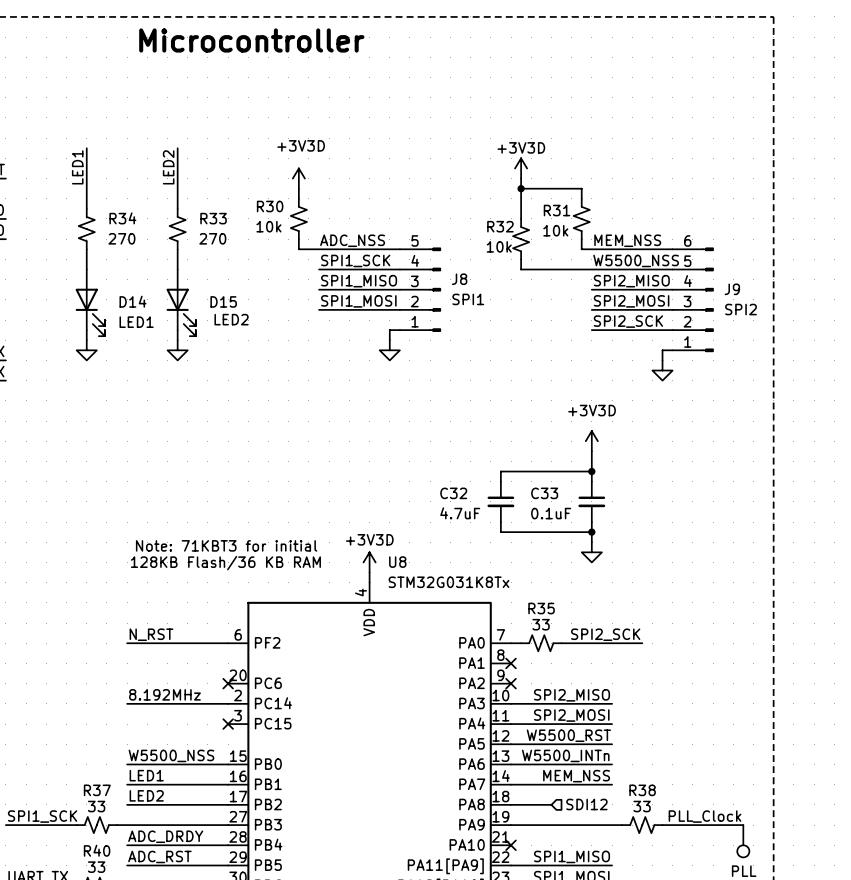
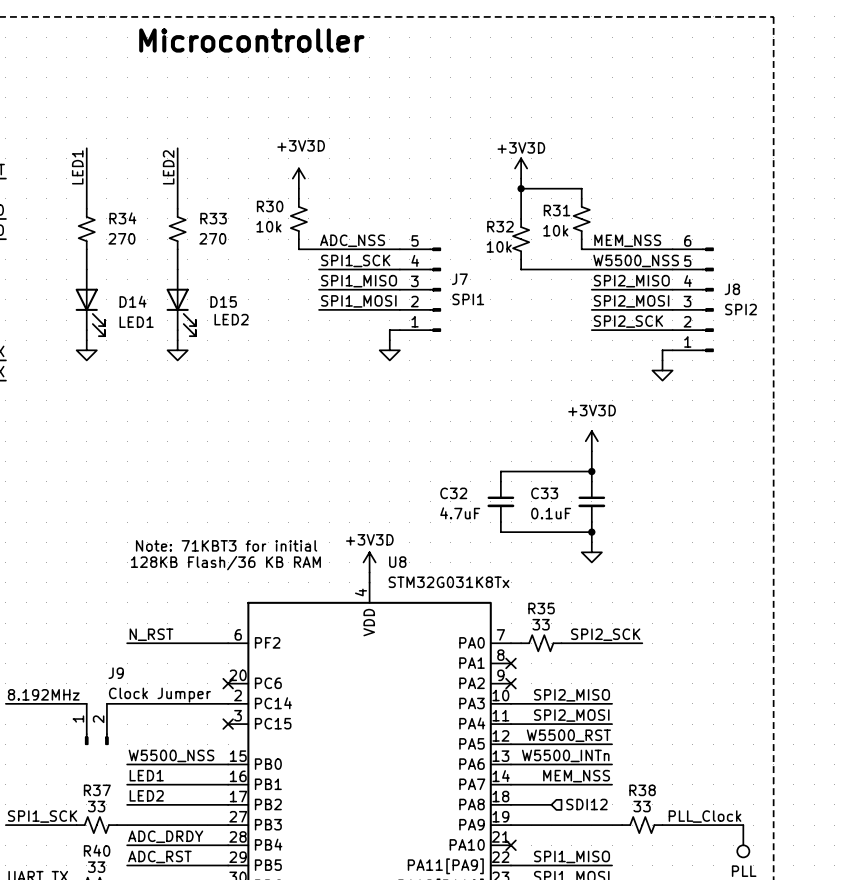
J8 name: J8 (459, 279) -> J7 (459, 279)
J9 name: J9 (732, 289) -> J8 (732, 289)
label position: 8.192MHz (164, 694) -> 8.192MHz (43, 694)
wire: none -> (5, 703) (86, 703)
wire: none -> (106, 703) (127, 703)
J9: none -> Clock Jumper (96, 724)

